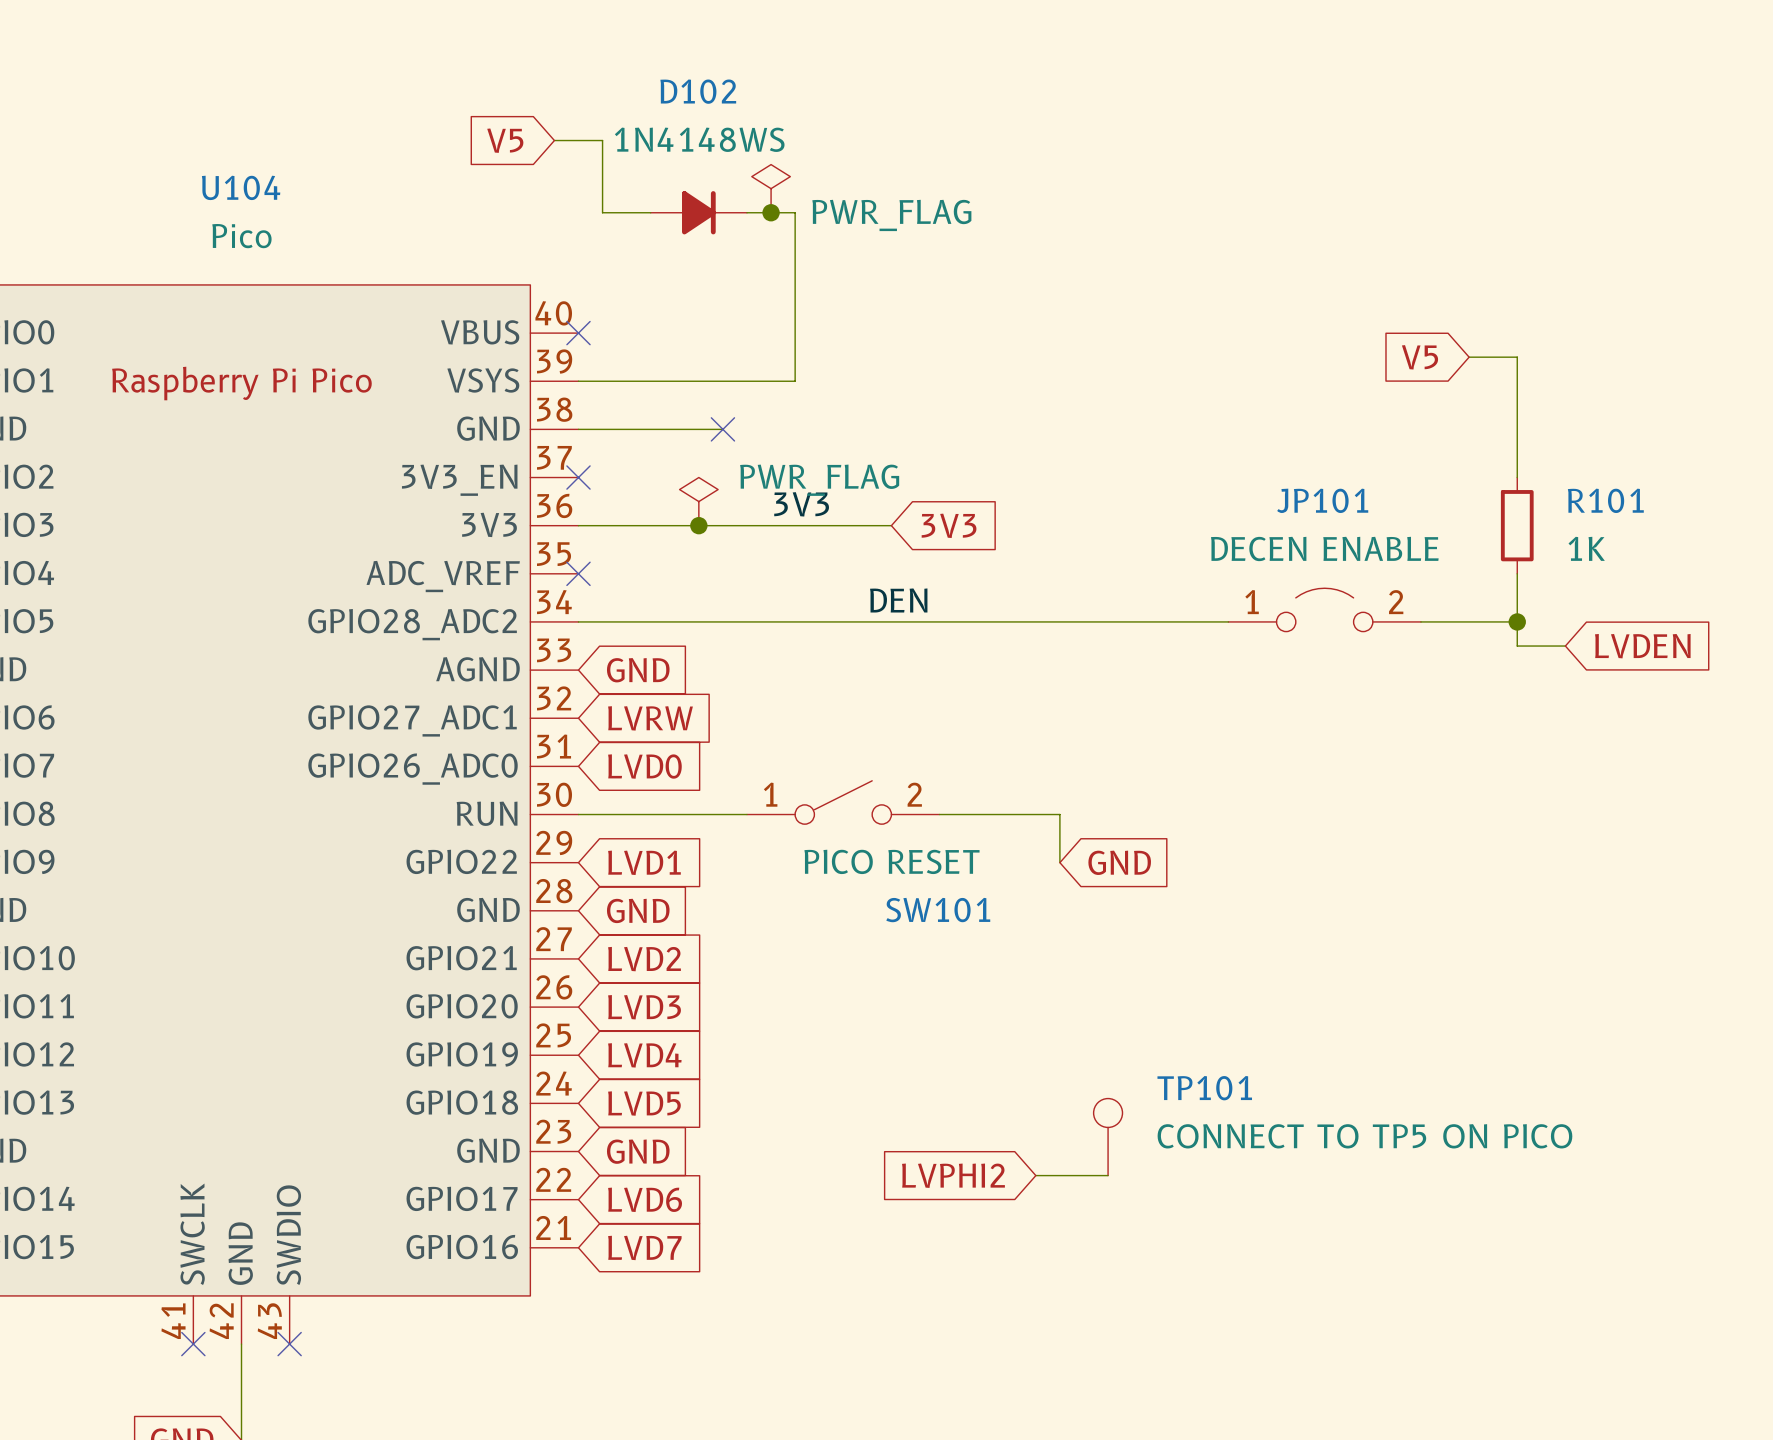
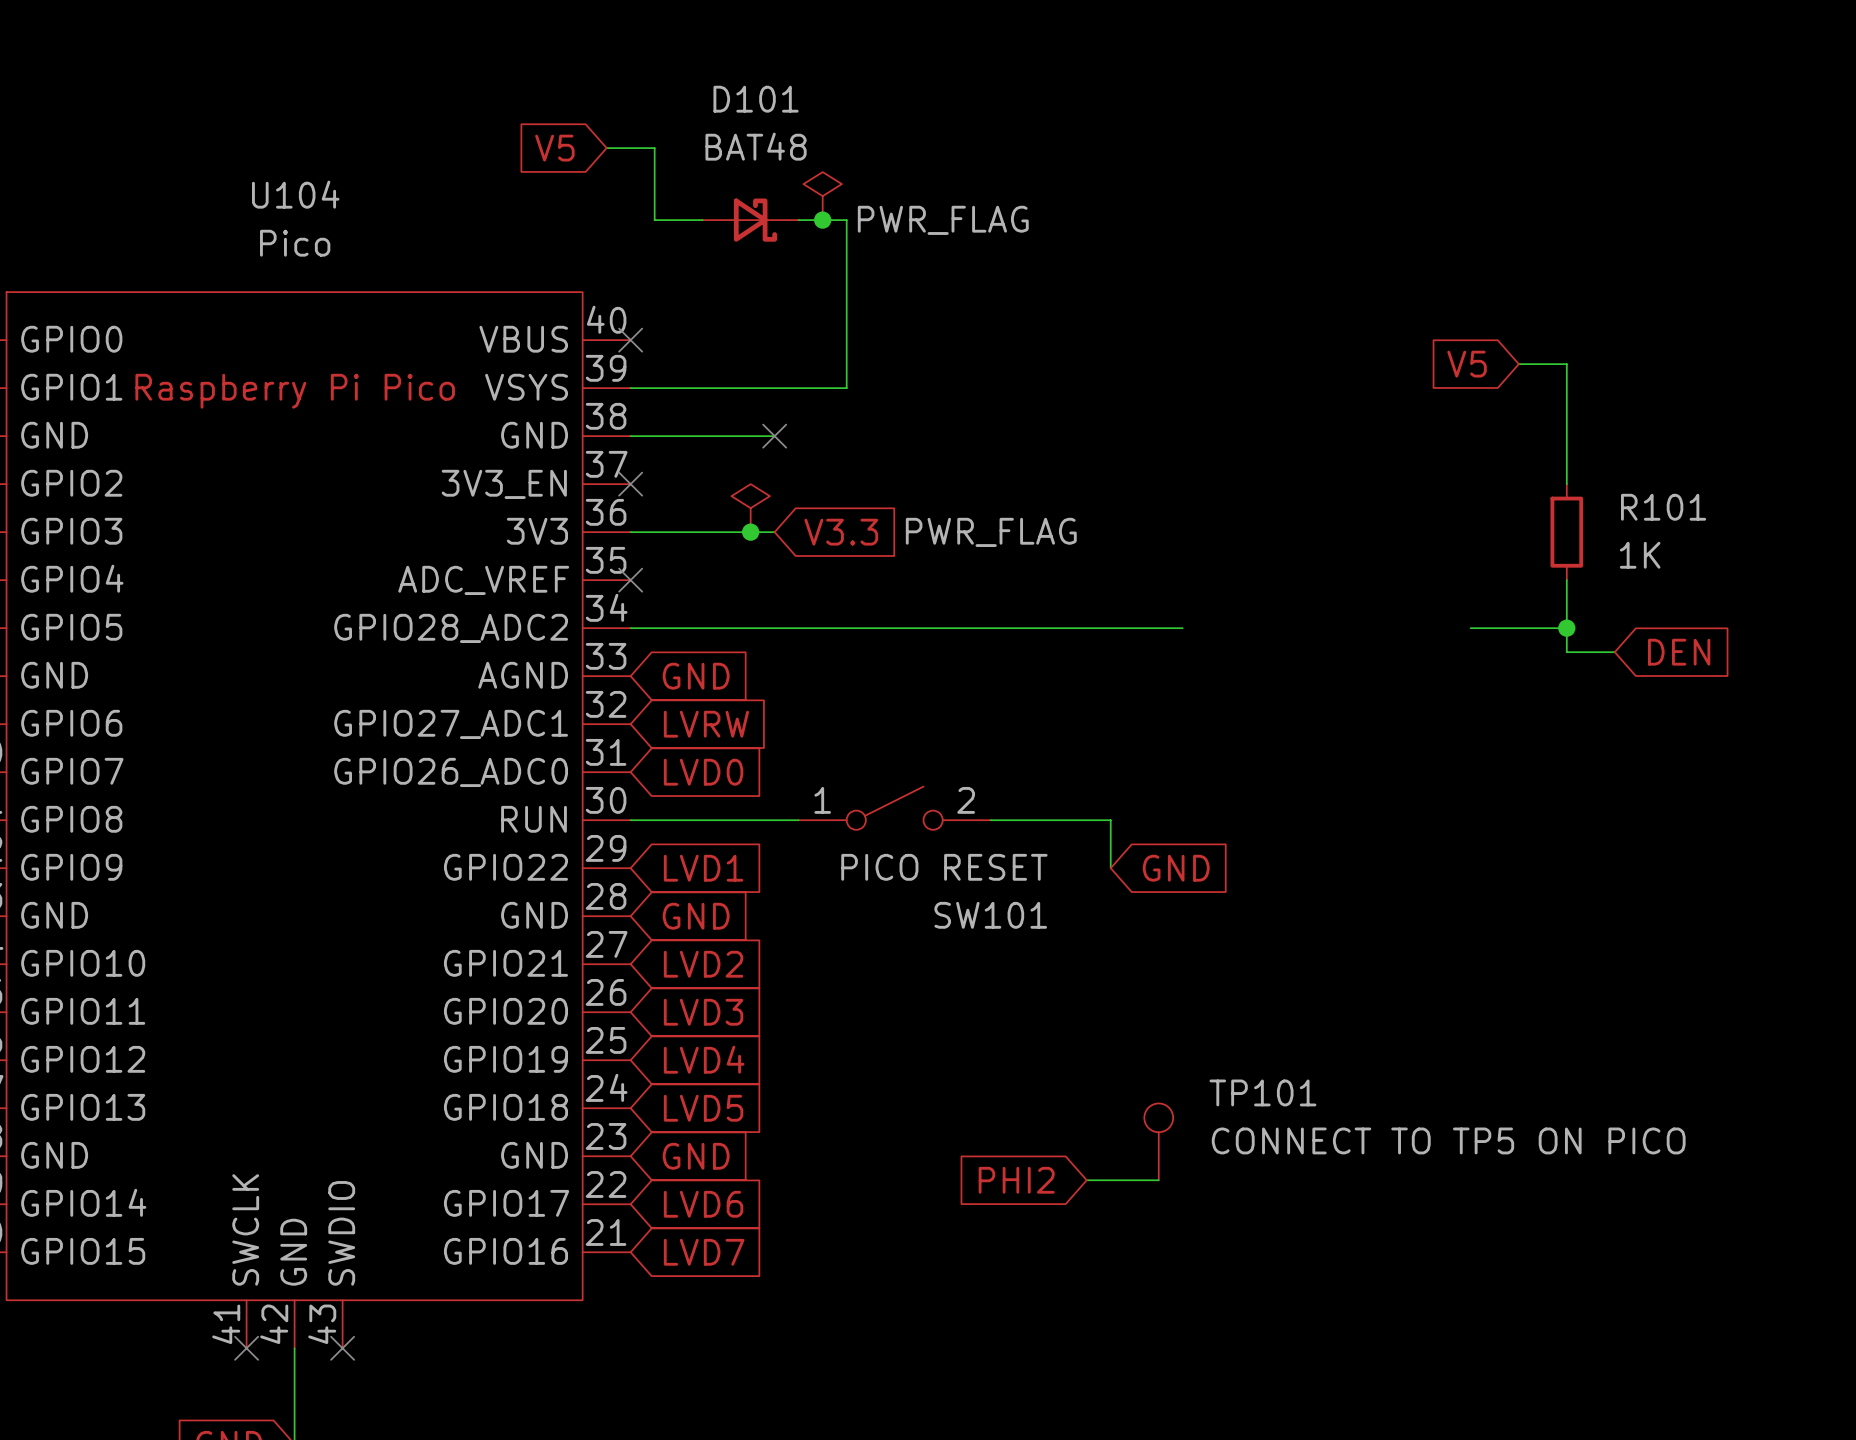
D102: 1N4148WS (698, 212) -> none
D101: none -> BAT48 (750, 220)
power symbol text position: PWR_FLAG (819, 480) -> PWR_FLAG (991, 532)
label: 3V3 (801, 504) -> none
wire: (722, 525) (891, 525) -> none
global label: none -> V3.3 (841, 532)
global label: 3V3 (949, 525) -> none
label: DEN (898, 600) -> none
JP101: DECEN ENABLE (1324, 609) -> none
wire: (1132, 621) (1228, 621) -> none
global label: LVDEN (1642, 646) -> DEN (1679, 652)
global label: LVPHI2 (953, 1175) -> PHI2 (1016, 1180)

